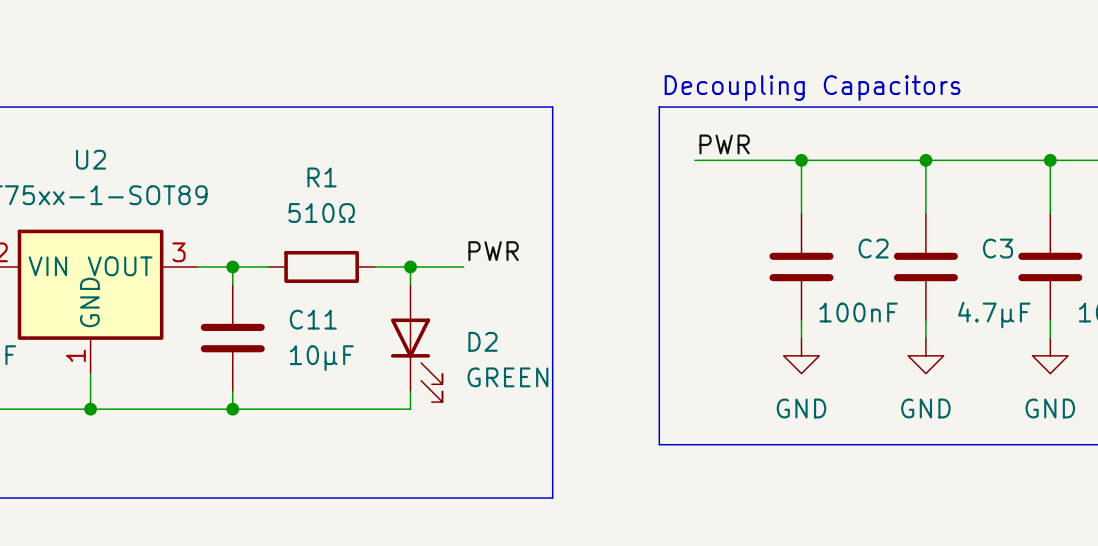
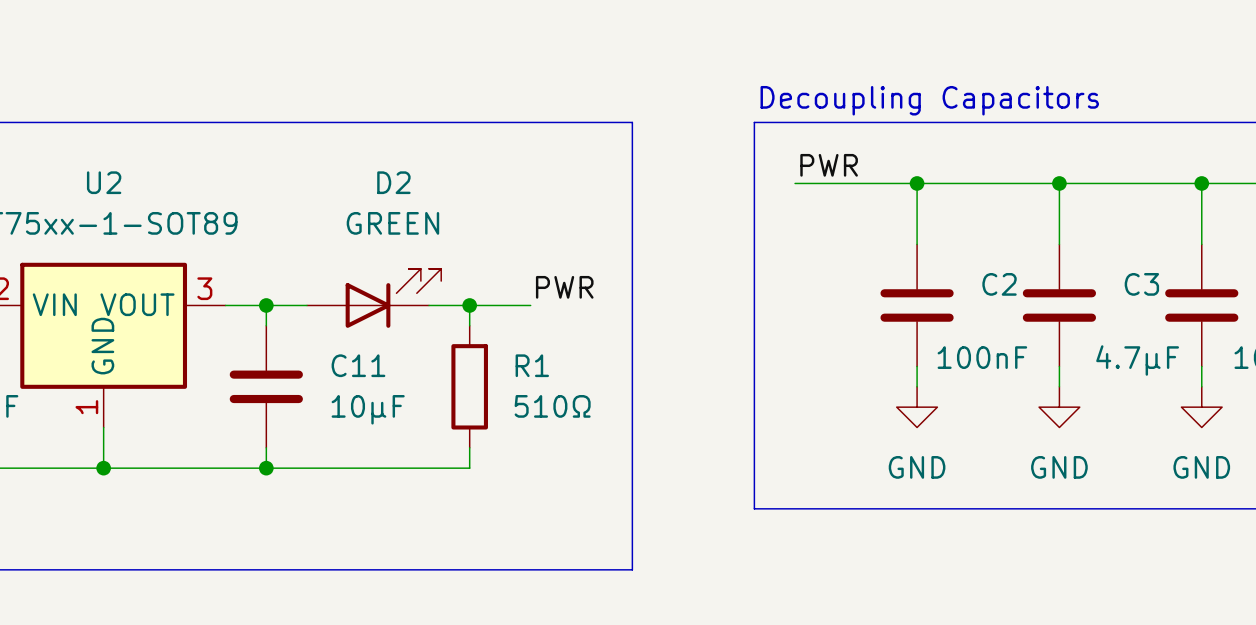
R1 name position: R1 (322, 177) -> R1 (532, 365)
R1 value position: 510Ω (321, 213) -> 510Ω (552, 406)
R1 rotation: 0° (321, 266) -> 90° clockwise (469, 386)
R1 position: (321, 266) -> (469, 386)
D2 name position: D2 (482, 341) -> D2 (393, 182)
D2 position: (416, 343) -> (374, 298)
D2 rotation: 0° (416, 360) -> 90° counterclockwise (393, 298)
D2 value position: GREEN (507, 377) -> GREEN (392, 223)

